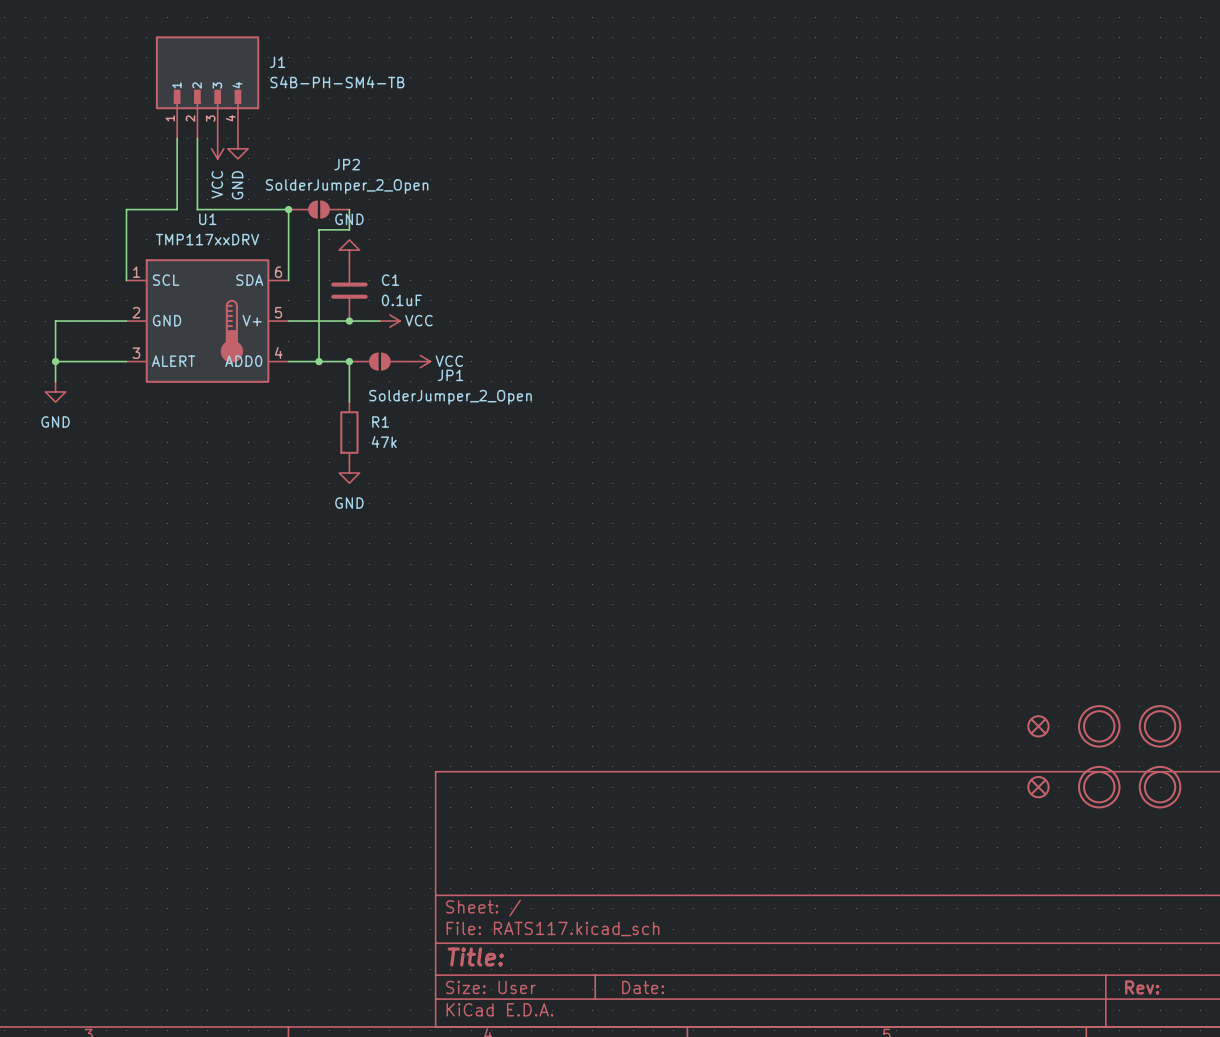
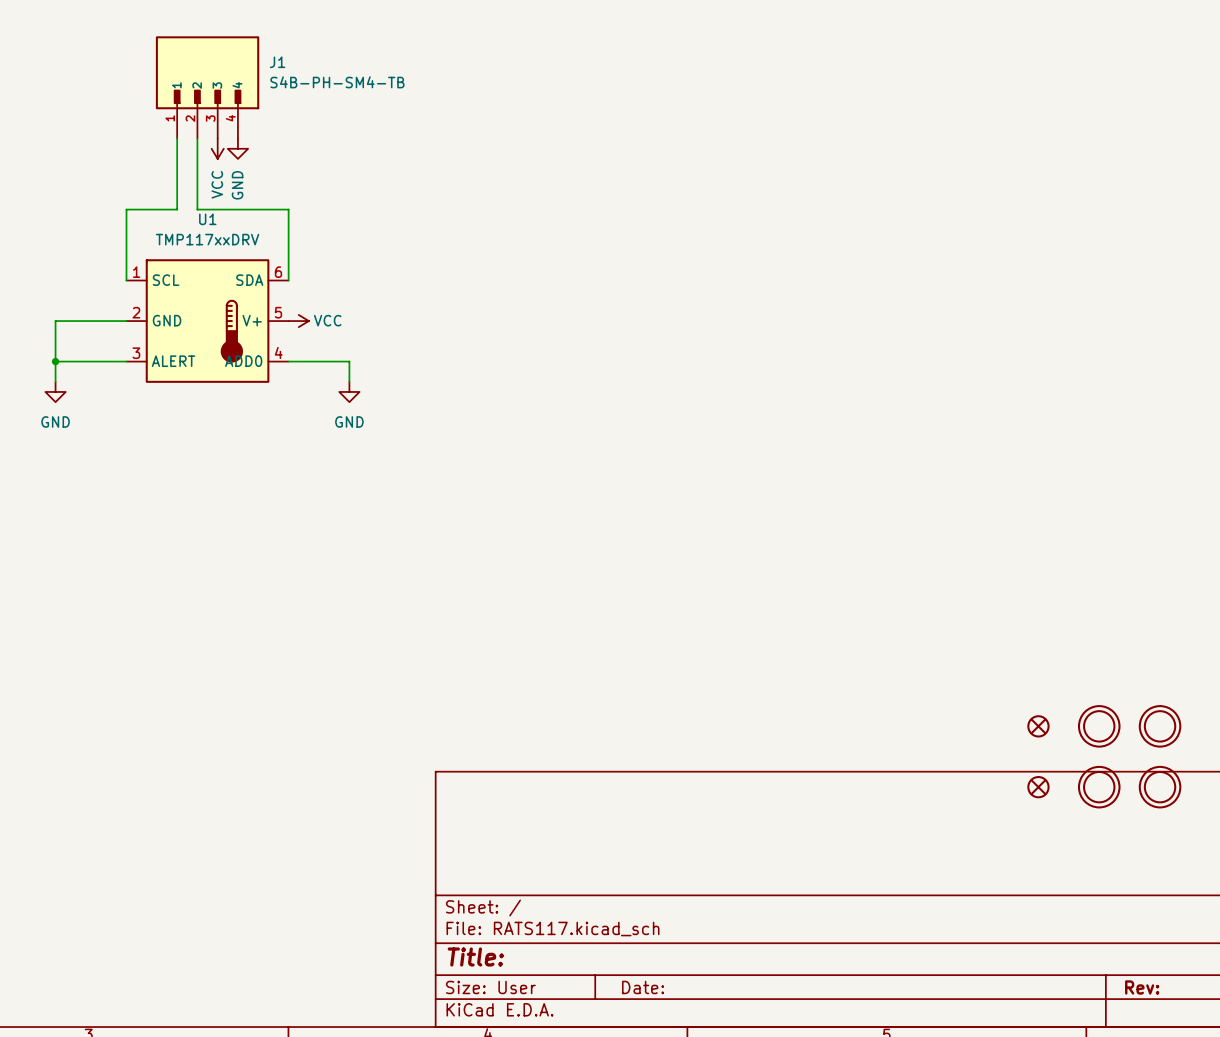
junction: (288, 209) -> none
JP2: SolderJumper_2_Open (319, 209) -> none
wire: (349, 209) (349, 229) (319, 229) (319, 361) -> none
power symbol: GND (349, 250) -> none
C1: 0.1uF (349, 290) -> none
wire: (288, 321) (379, 321) -> none
power symbol: none -> VCC (298, 321)
junction: (349, 321) -> none
power symbol: VCC (389, 321) -> none
junction: (319, 361) -> none
junction: (349, 361) -> none
JP1: SolderJumper_2_Open (379, 361) -> none
power symbol: VCC (420, 361) -> none
power symbol: none -> GND (349, 391)
R1: 47k (349, 432) -> none
power symbol: GND (349, 473) -> none

